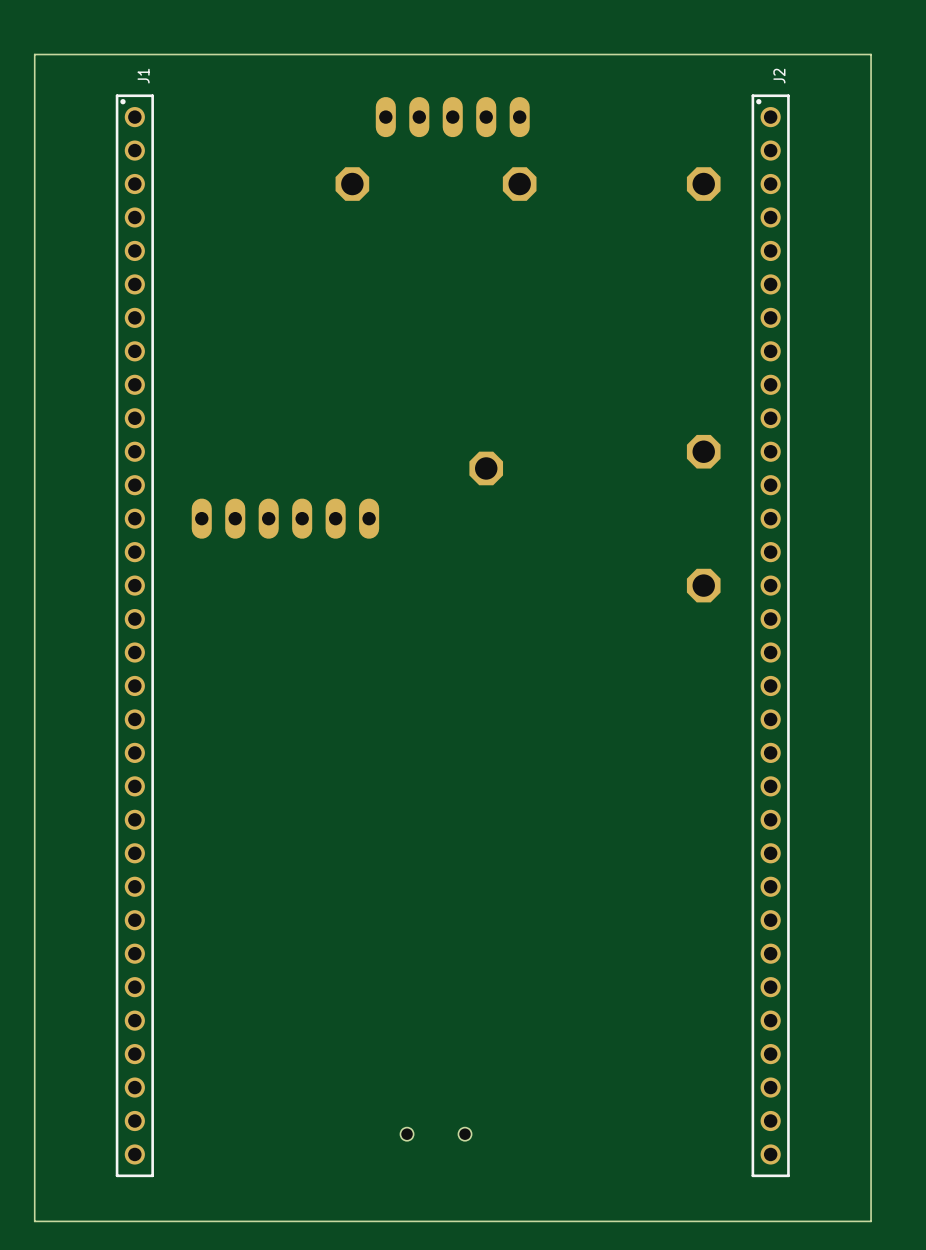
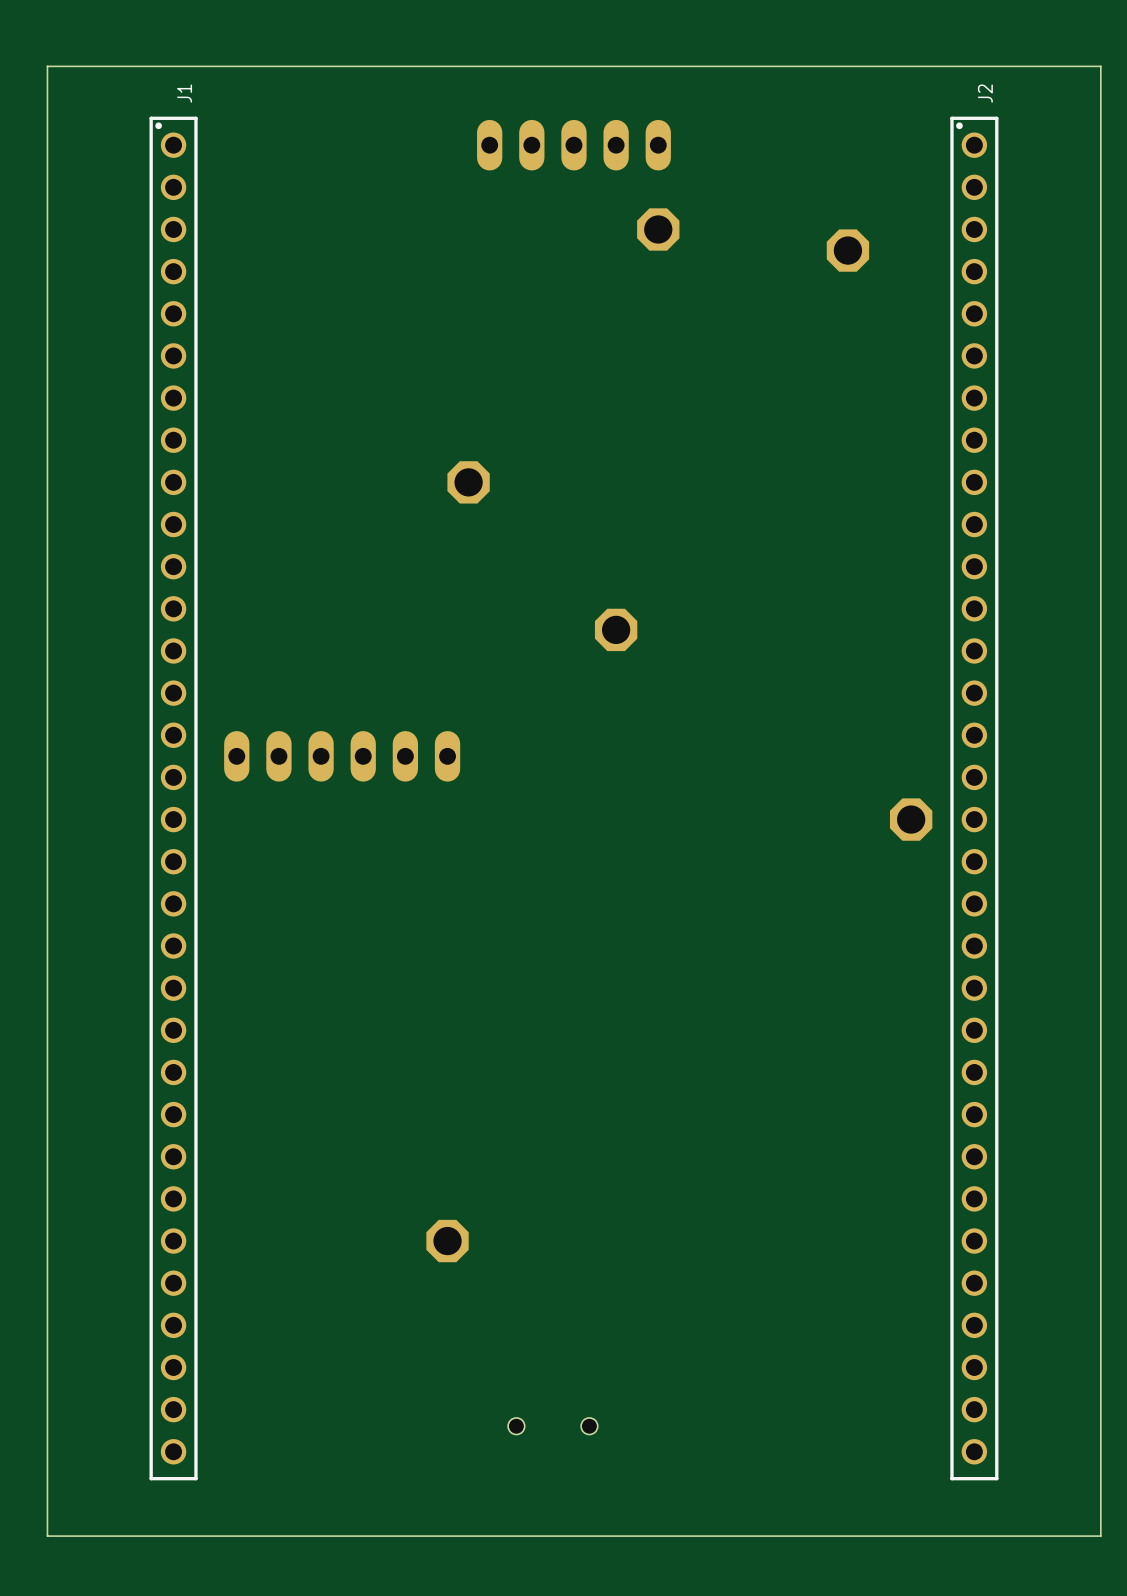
part: (352, 184) -> none
part position: (703, 184) -> (847, 250)
part: none -> (468, 482)
part: (703, 451) -> none
part position: (486, 468) -> (616, 629)
part position: (285, 518) -> (342, 756)
part position: (703, 585) -> (911, 819)
part: none -> (447, 1241)

